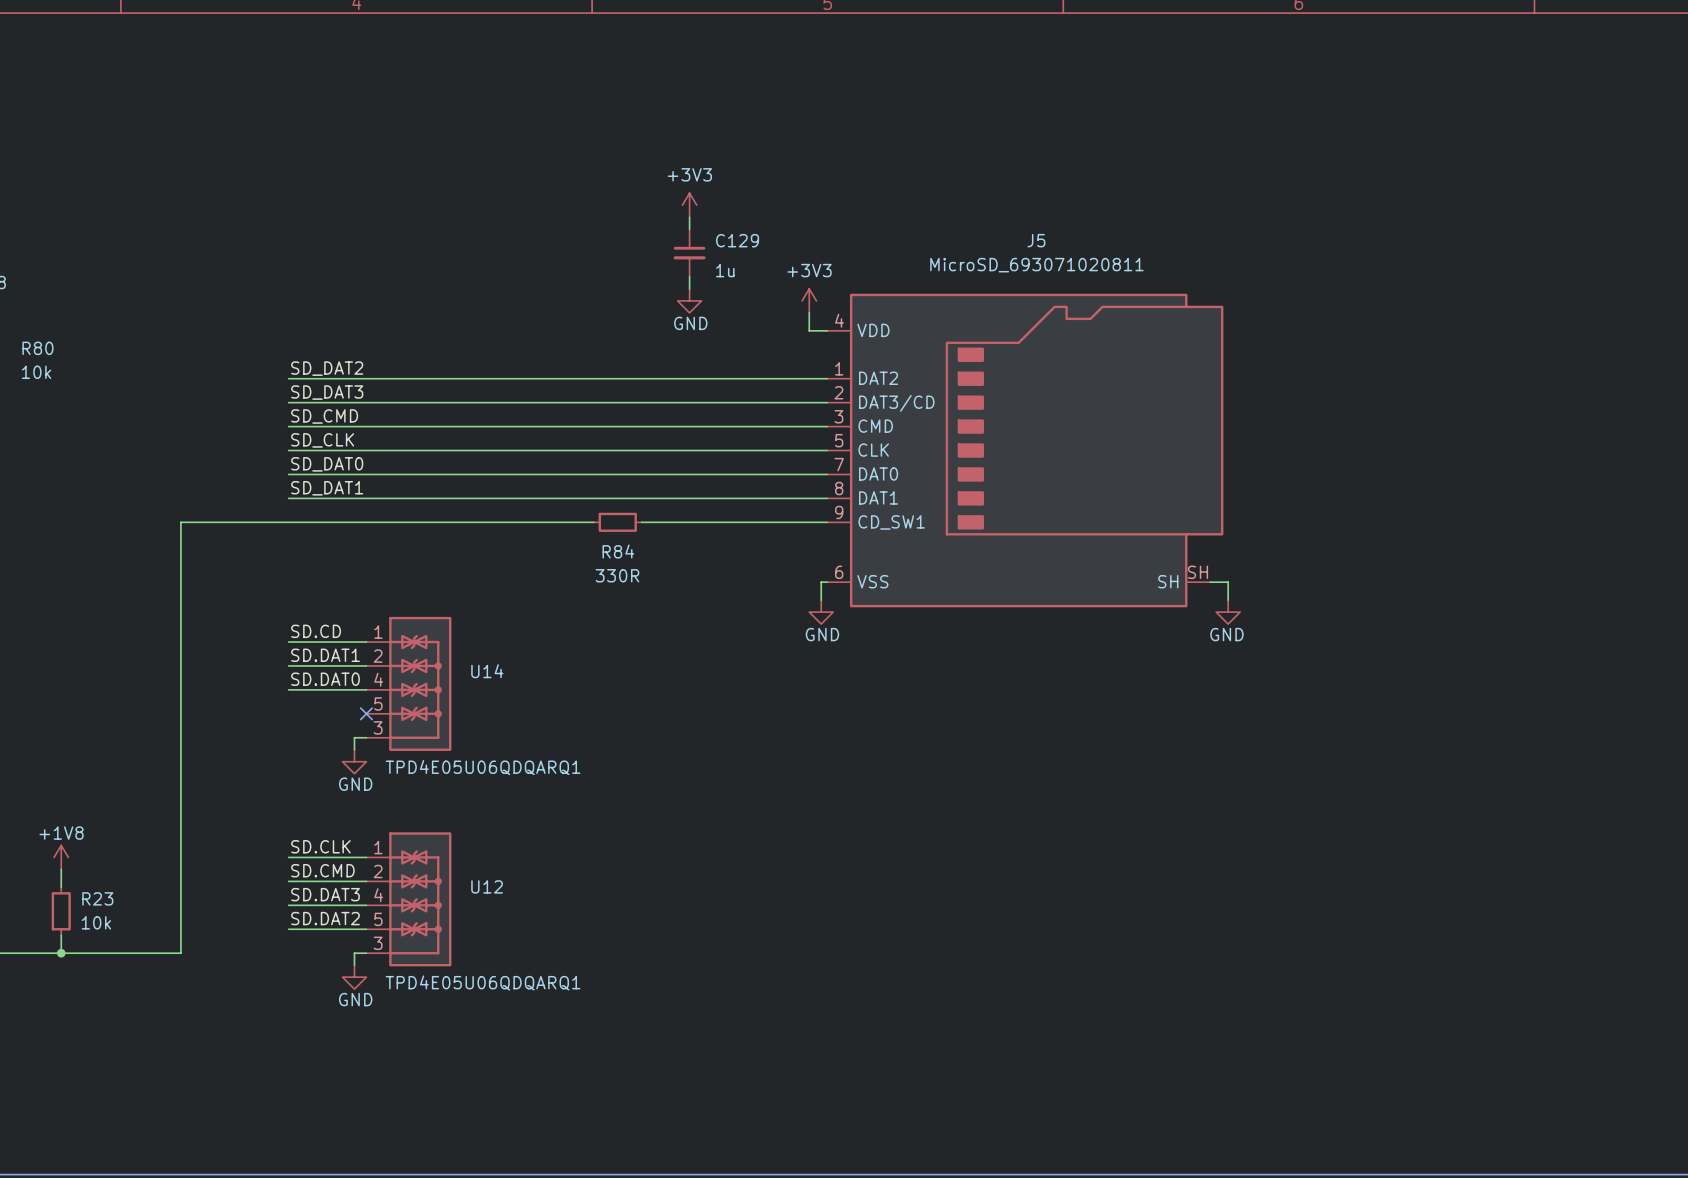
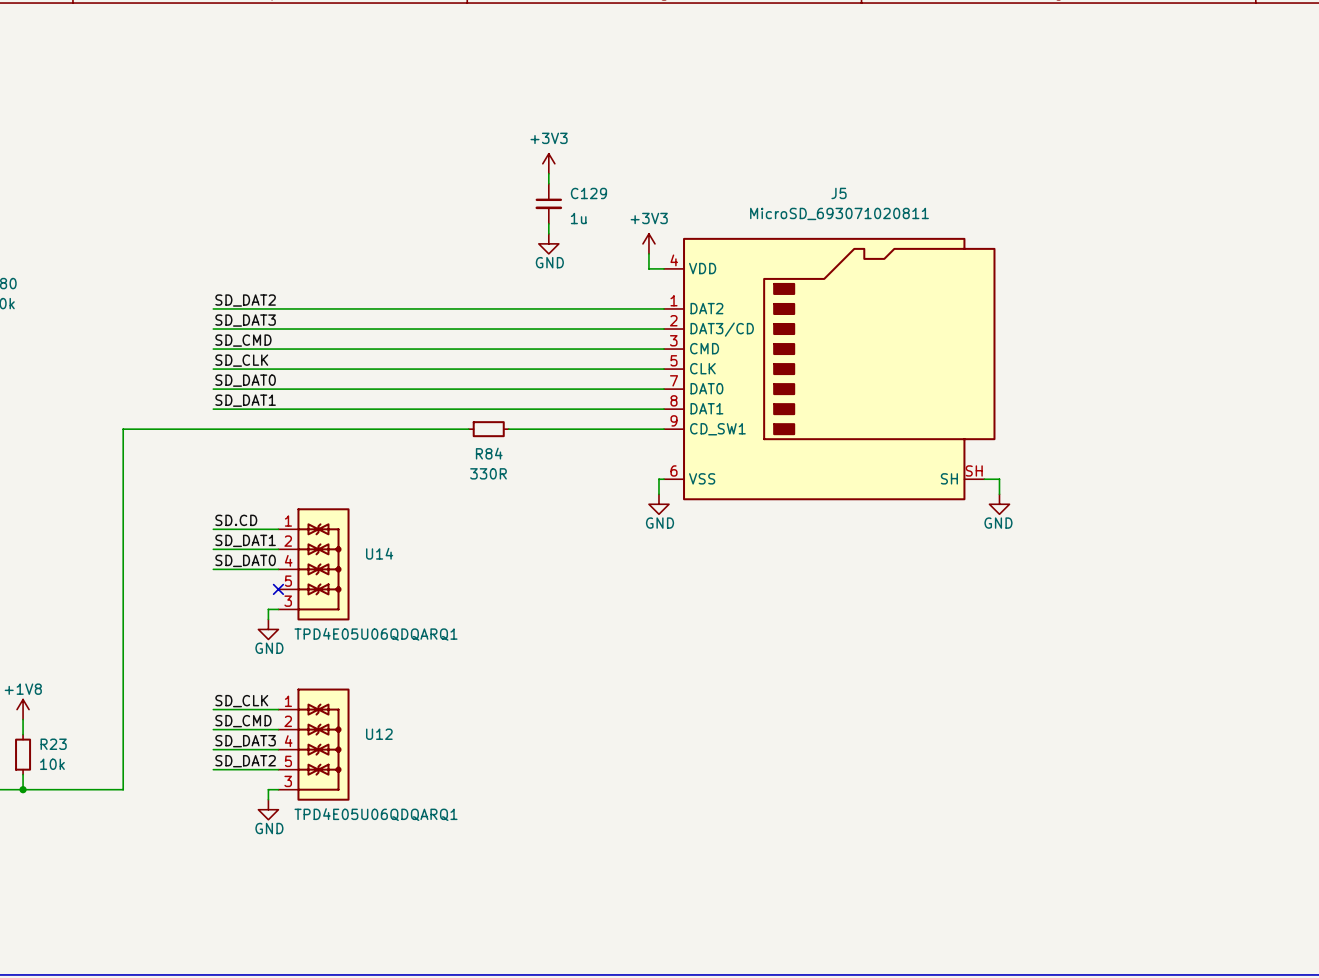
label: SD.DAT1 (325, 655) -> SD_DAT1 (245, 540)
label: SD.DAT0 (325, 679) -> SD_DAT0 (245, 560)
label: SD.CLK (320, 846) -> SD_CLK (241, 701)
label: SD.CMD (322, 870) -> SD_CMD (243, 721)
label: SD.DAT3 (325, 894) -> SD_DAT3 (245, 741)
label: SD.DAT2 (325, 918) -> SD_DAT2 (245, 761)

